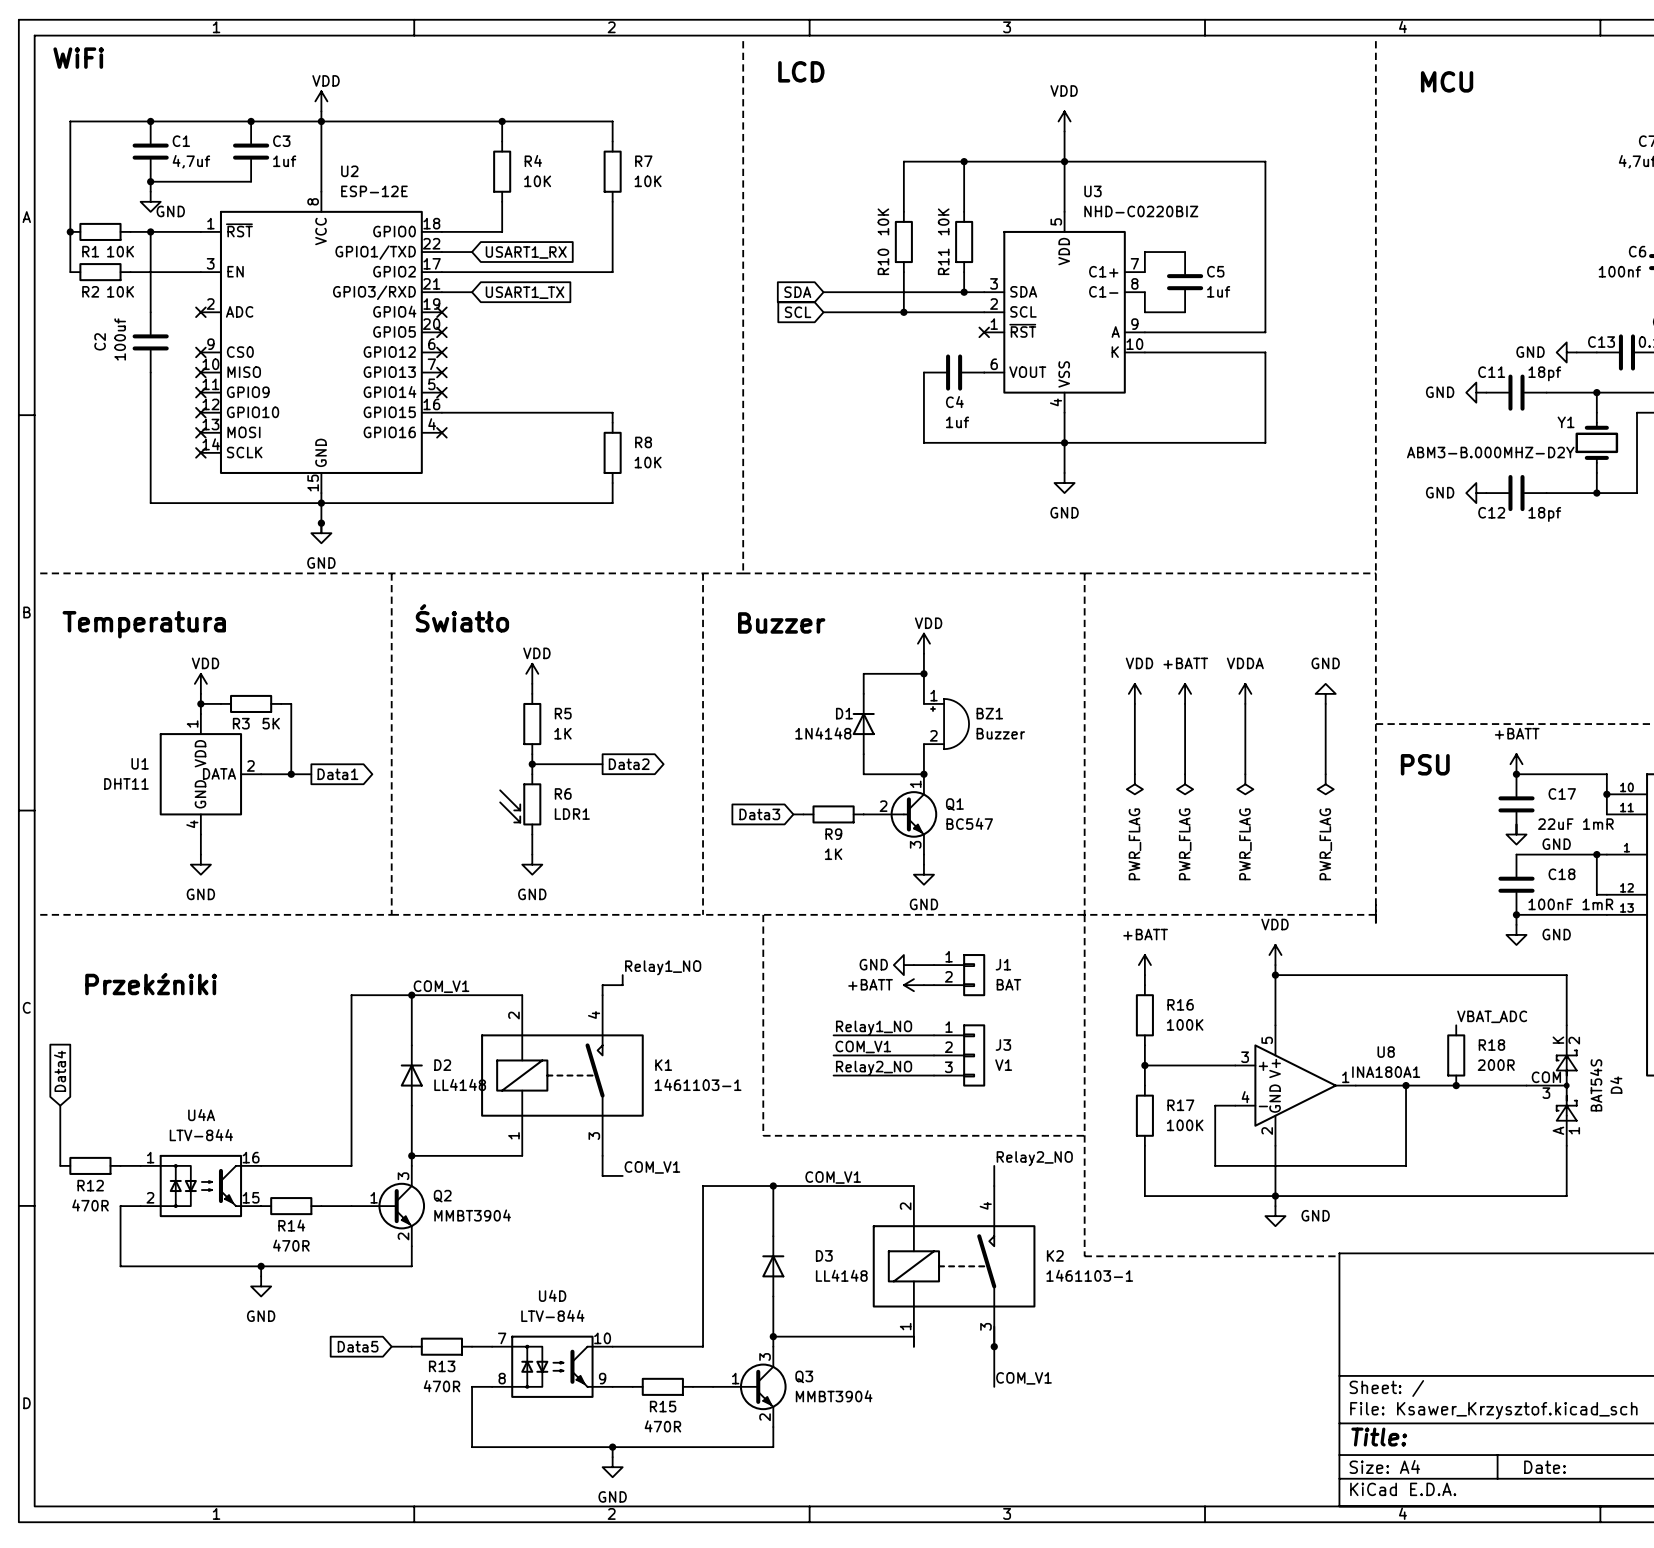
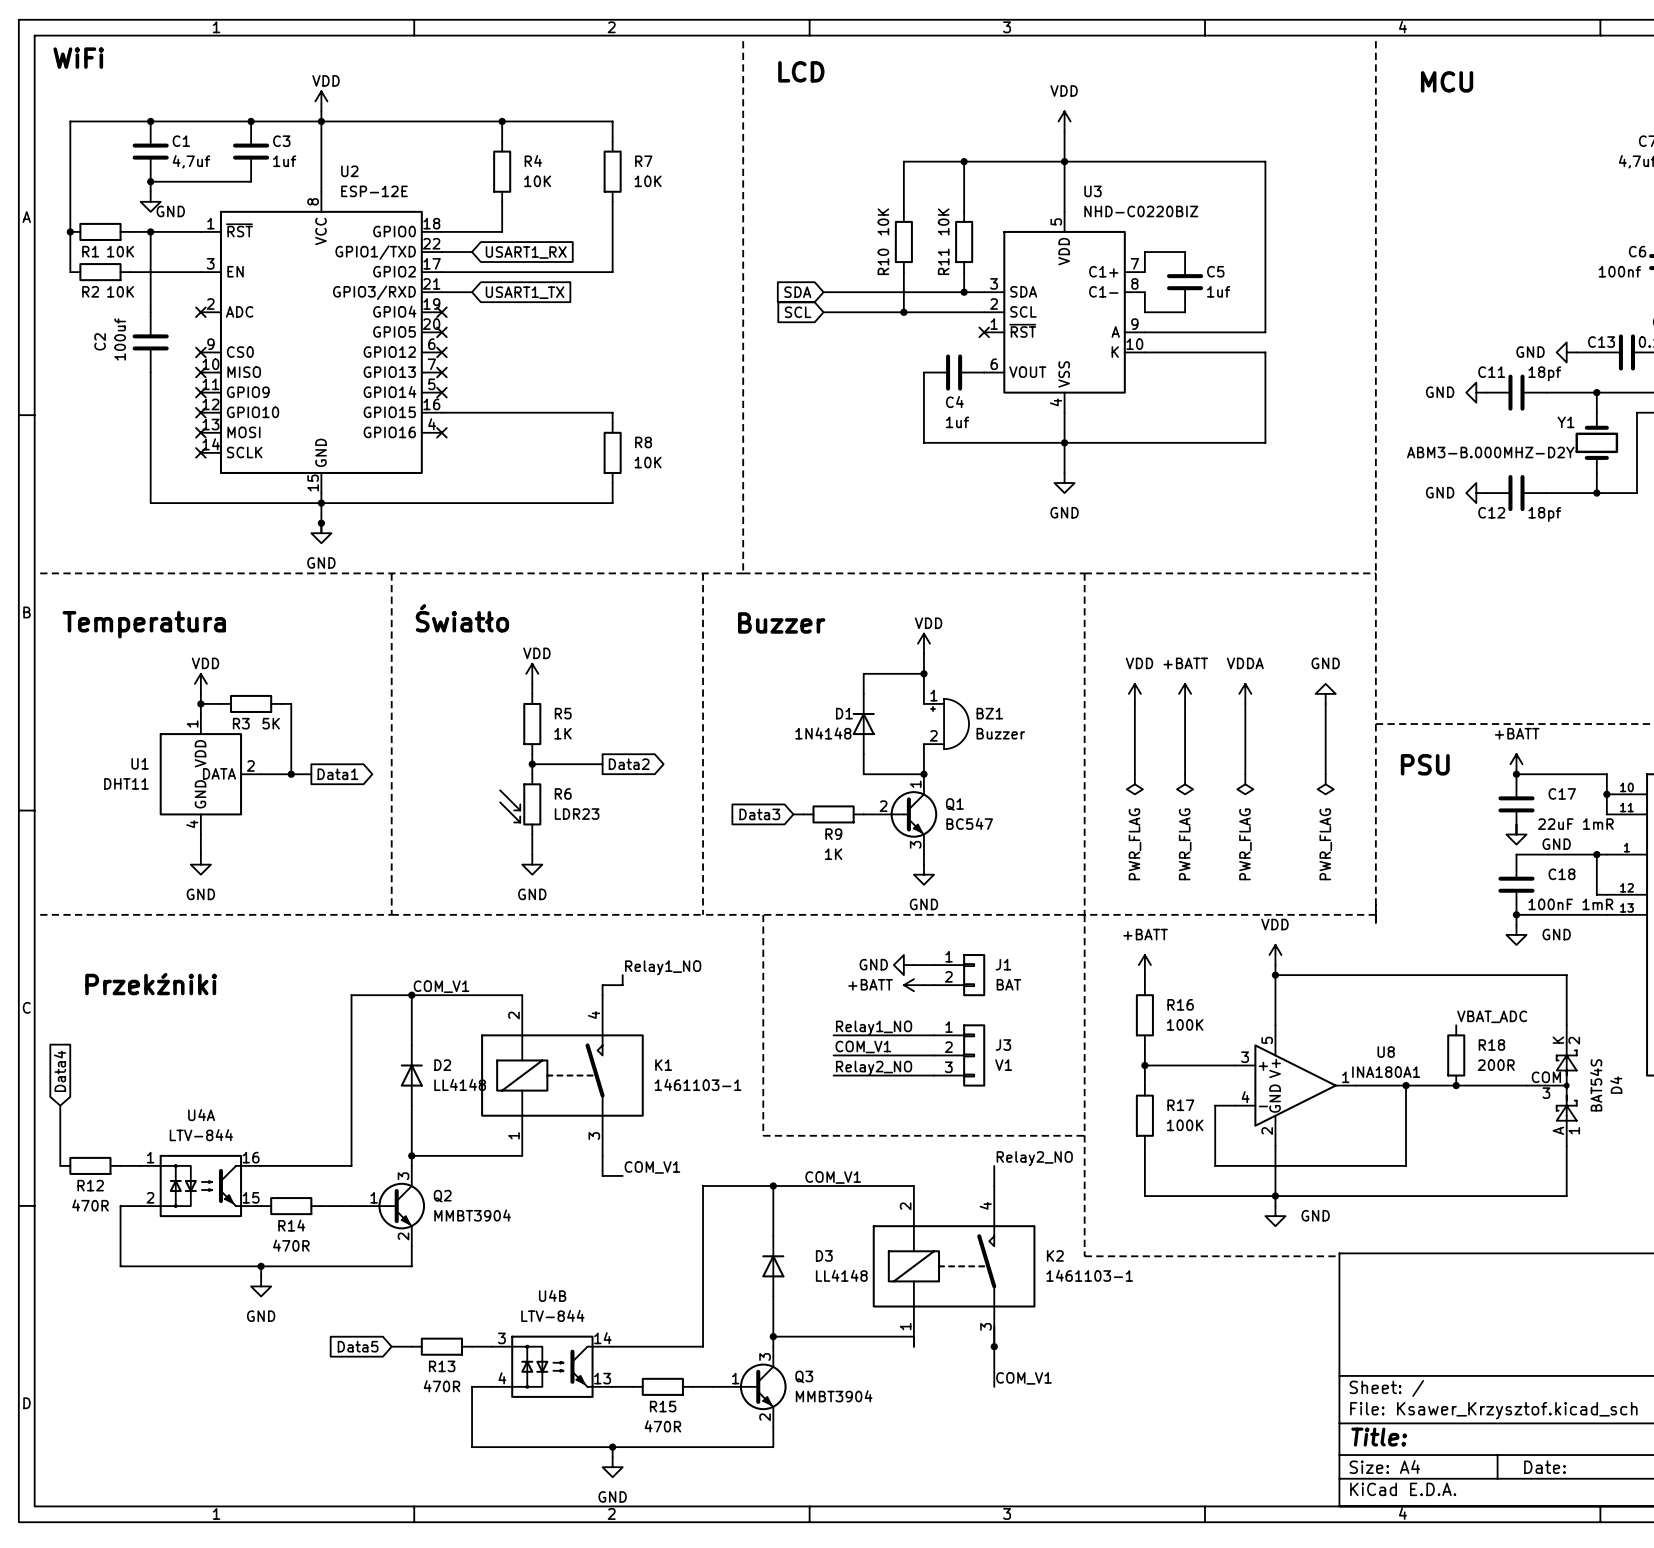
R6 value: LDR1 (572, 814) -> LDR23 (577, 814)
U4D name: U4D (552, 1295) -> U4B (552, 1295)
U4D pin number: 7 (502, 1338) -> 3 (501, 1338)
U4D pin number: 10 (602, 1338) -> 14 (602, 1338)
U4D pin number: 8 (502, 1378) -> 4 (502, 1378)
U4D pin number: 9 (602, 1378) -> 13 (602, 1378)

